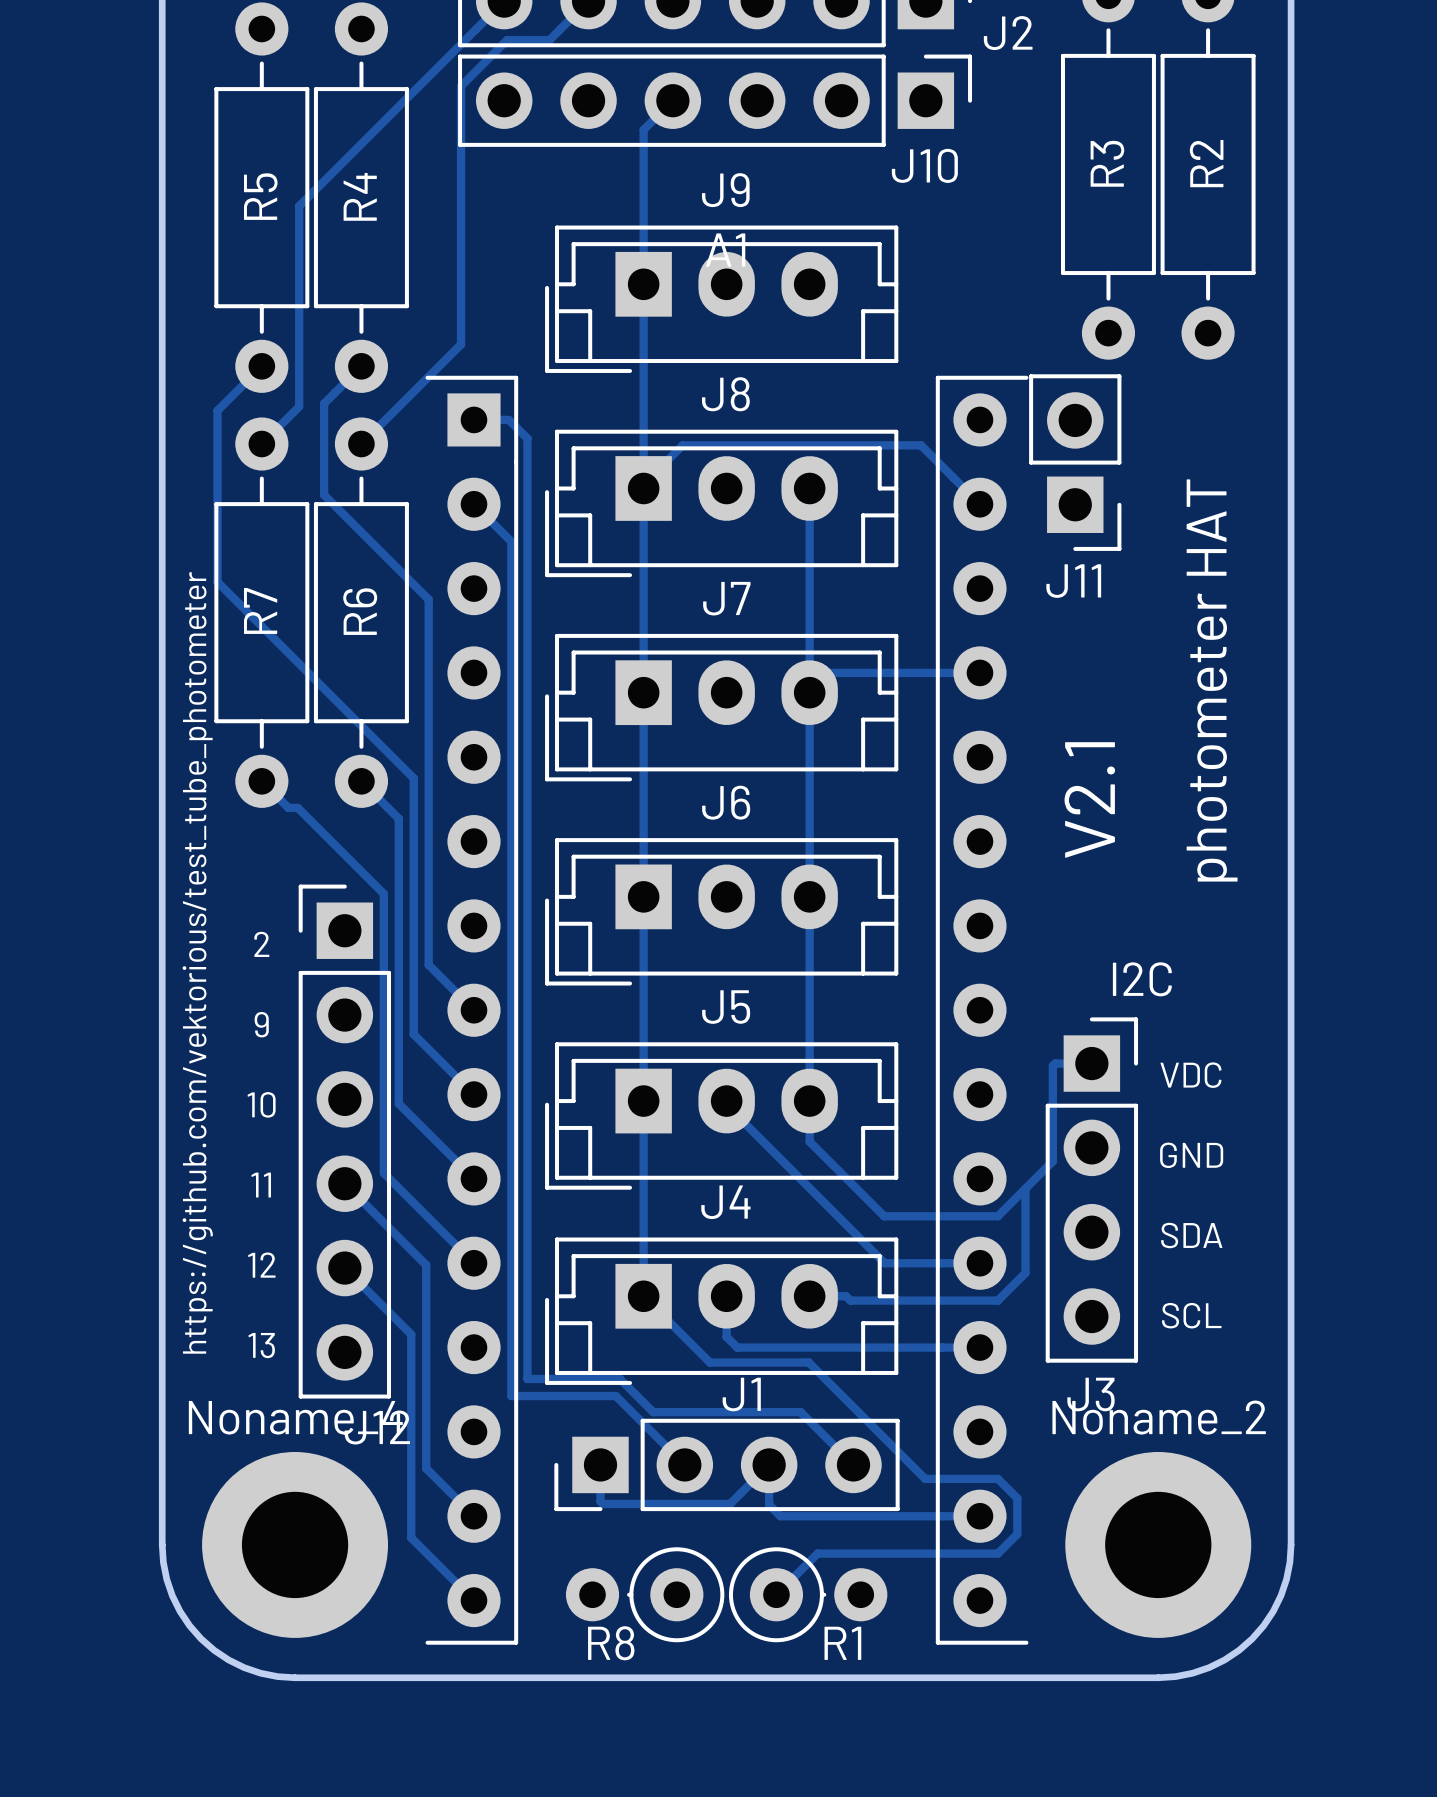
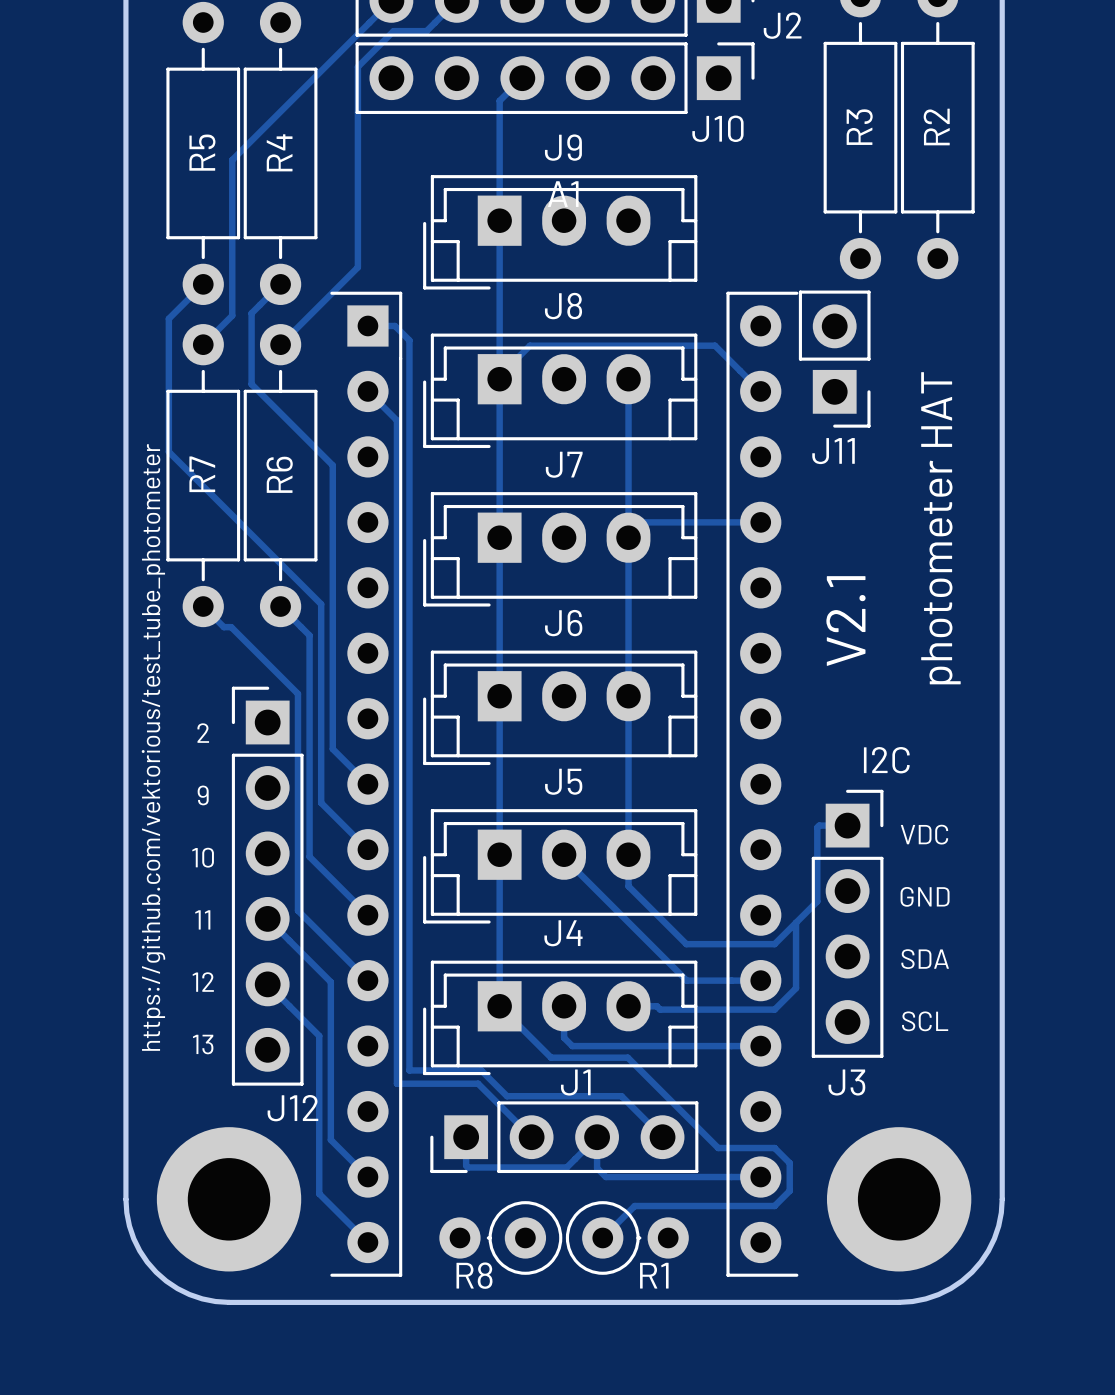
Noname_4 name: Noname_4 (295, 1417) -> none
Noname_2 name: Noname_2 (1159, 1417) -> none

